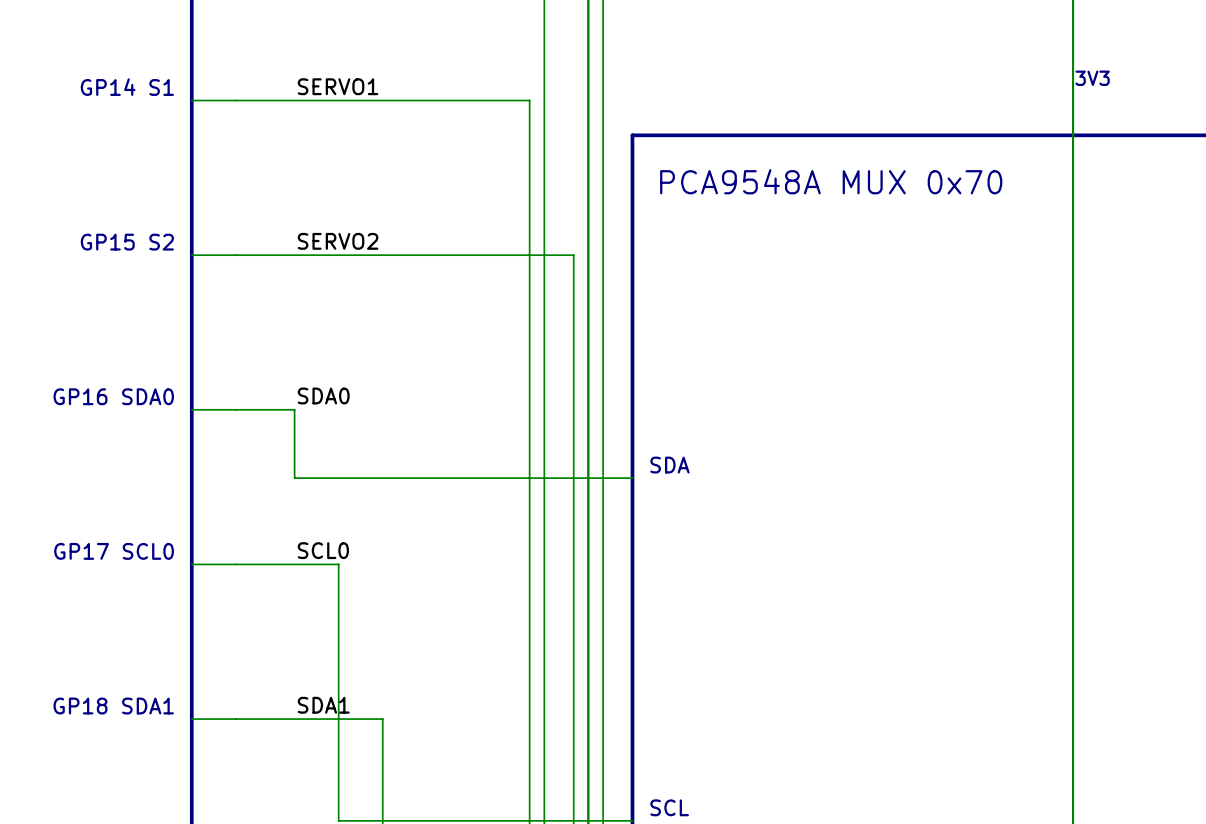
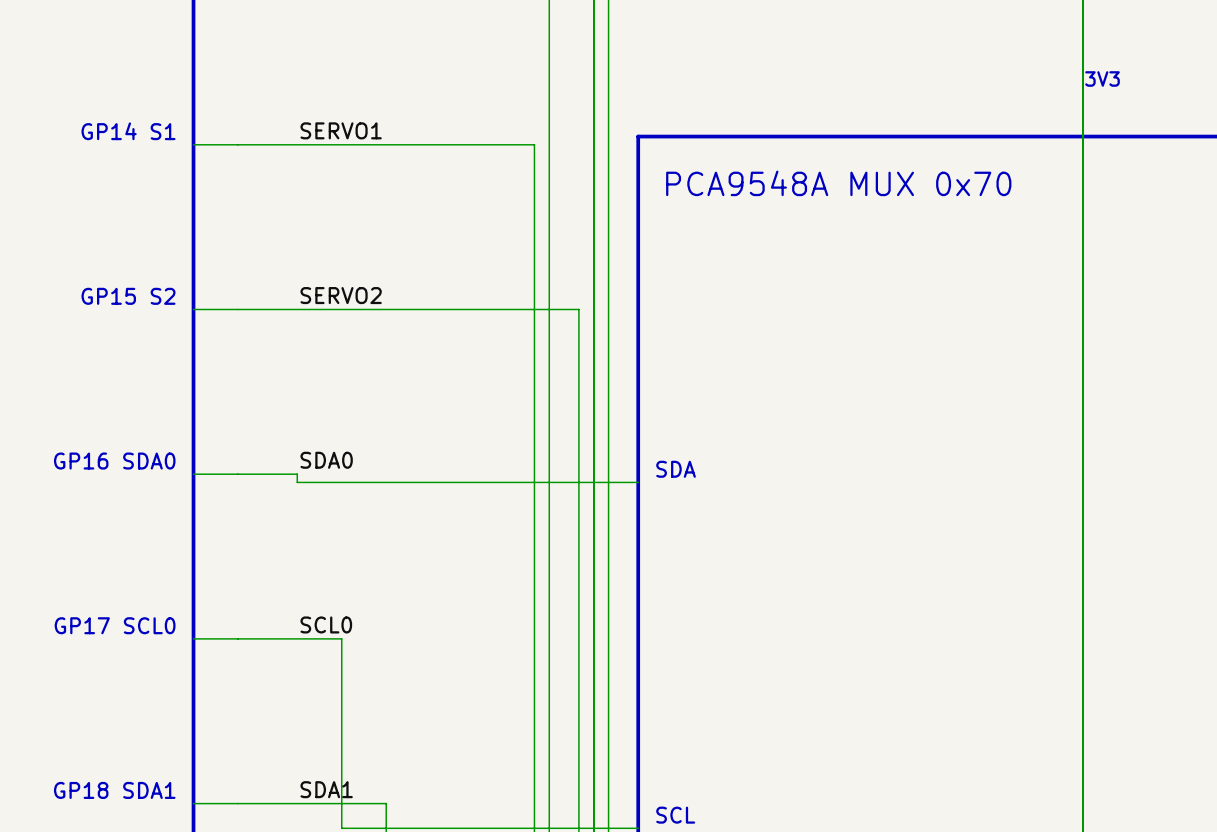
label position: SERVO1 (338, 86) -> SERVO1 (341, 130)
text position: GP14 S1 (127, 87) -> GP14 S1 (128, 131)
wire: (191, 100) (529, 100) (529, 143) -> (193, 144) (534, 144)
label position: SERVO2 (338, 241) -> SERVO2 (341, 295)
text position: GP15 S2 (127, 242) -> GP15 S2 (128, 296)
wire: (191, 255) (573, 255) (573, 306) -> (193, 309) (578, 309)
label position: SDA0 (323, 395) -> SDA0 (326, 460)
text position: GP16 SDA0 (113, 396) -> GP16 SDA0 (114, 461)
wire: (191, 409) (294, 409) (294, 469) -> (193, 474) (297, 474)
label position: SCL0 (323, 550) -> SCL0 (326, 624)
text position: GP17 SCL0 (114, 551) -> GP17 SCL0 (115, 625)
wire: (191, 564) (338, 564) (338, 633) -> (193, 638) (341, 638)
label position: SDA1 (323, 705) -> SDA1 (326, 789)
text position: GP18 SDA1 (113, 706) -> GP18 SDA1 (114, 790)
wire: (191, 719) (382, 719) (382, 796) -> (193, 803) (386, 803)

